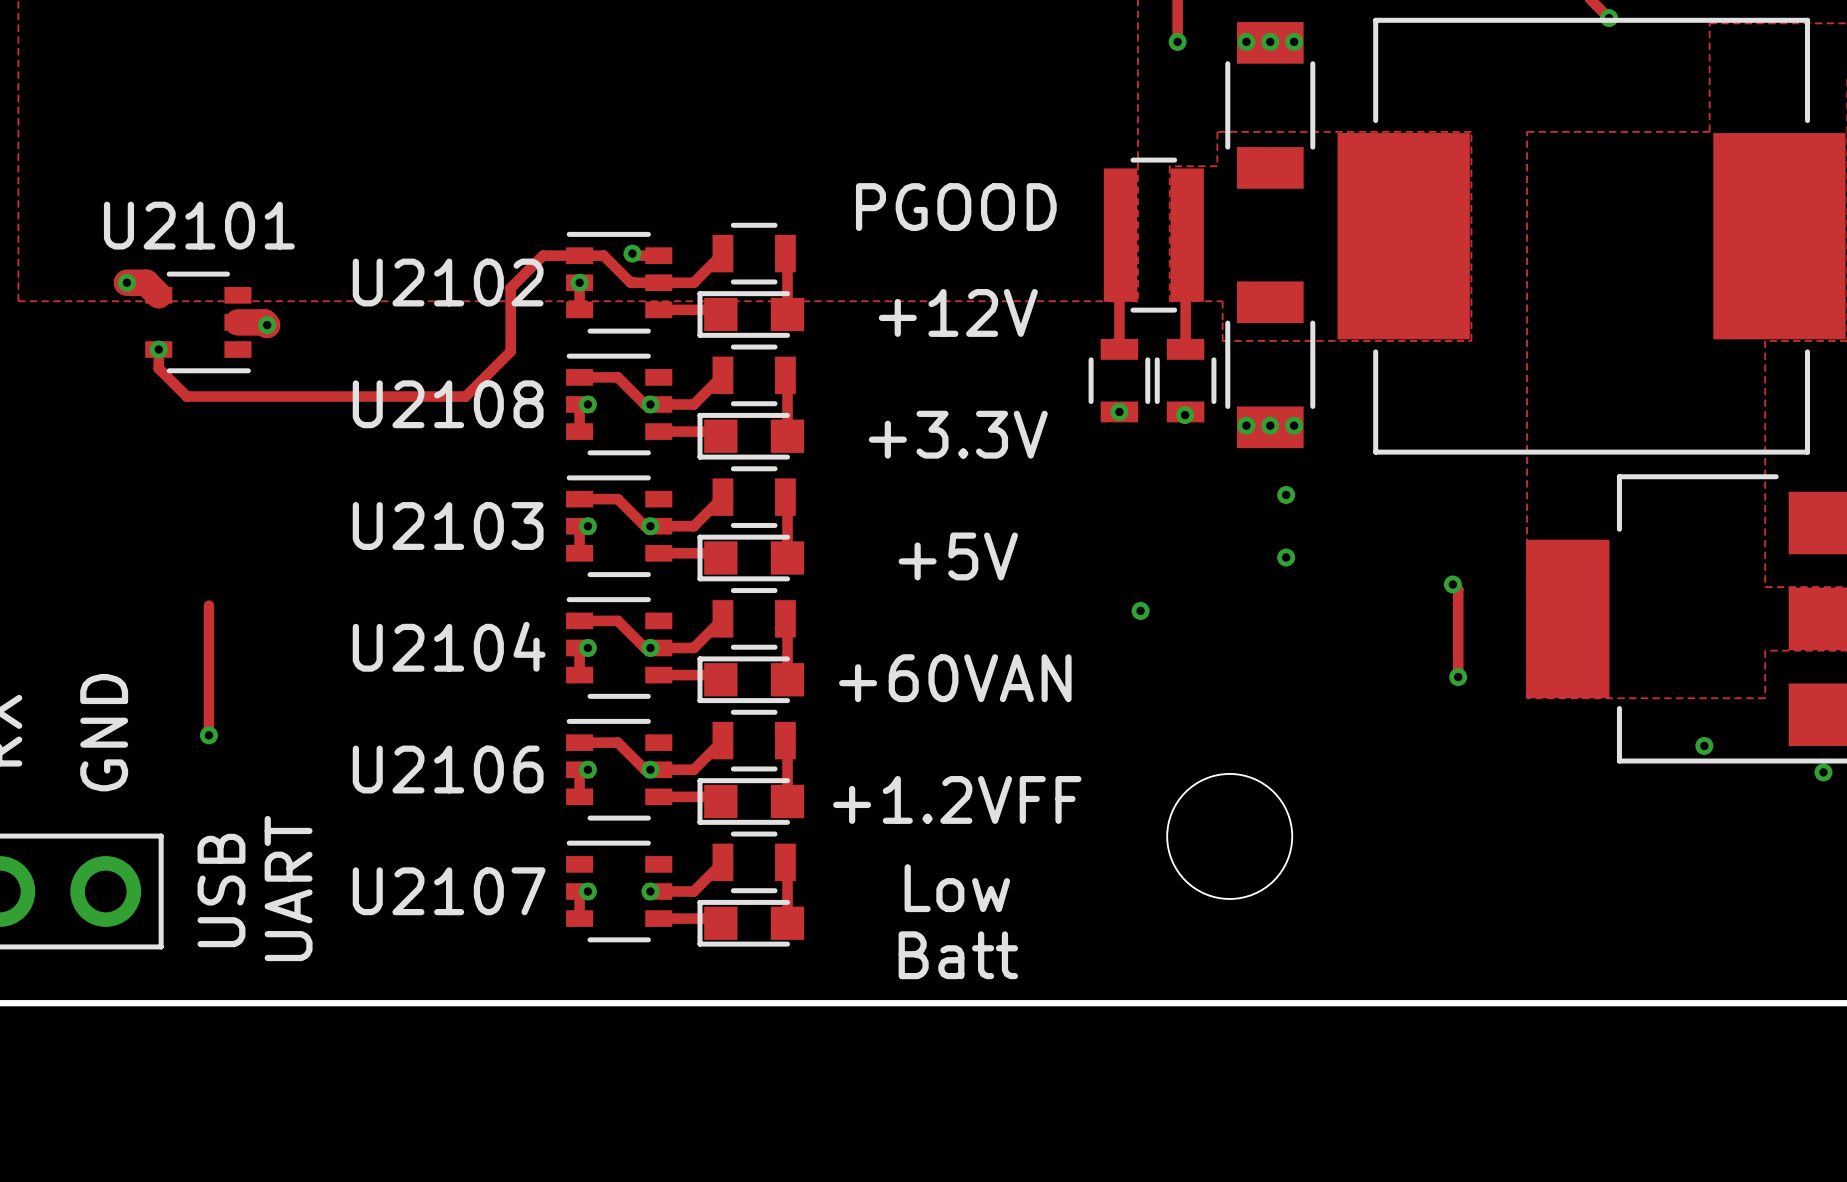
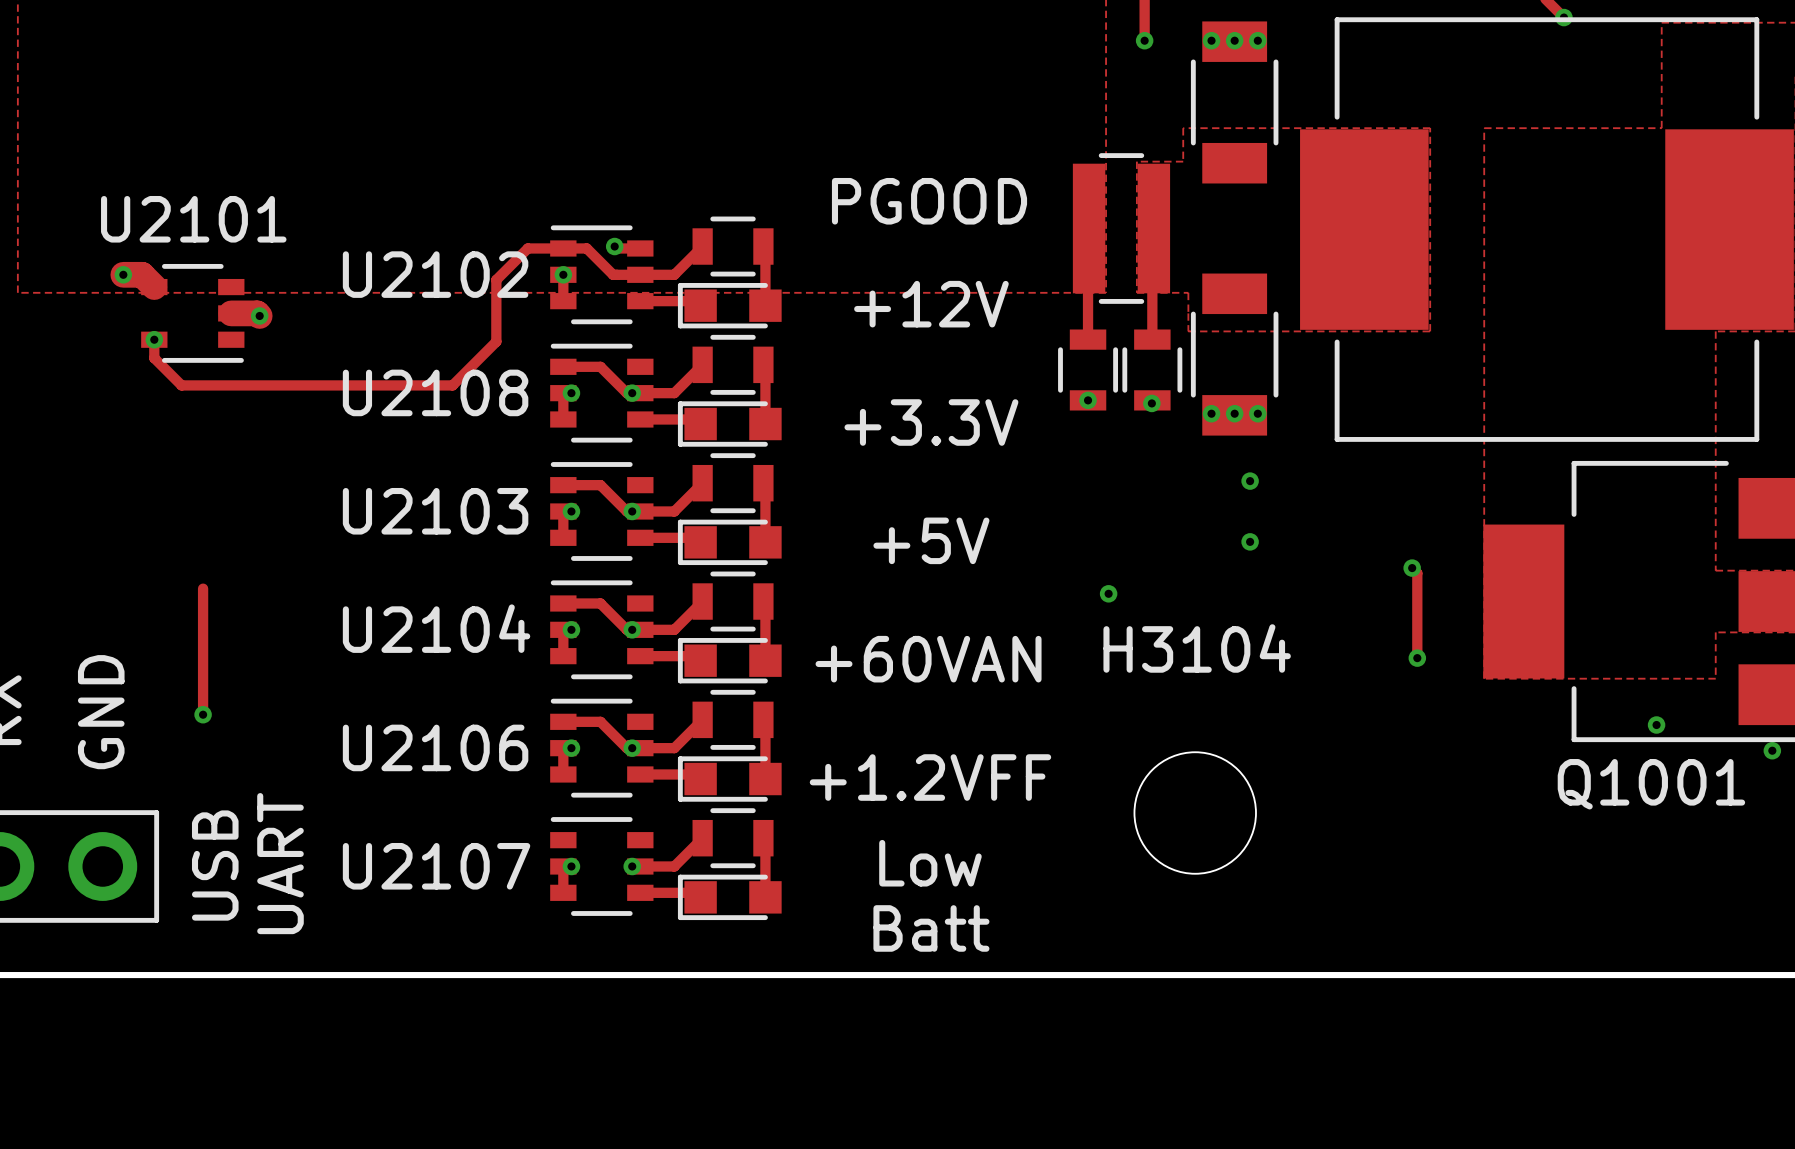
H3104 name: none -> H3104 (1197, 648)
Q1001 name: none -> Q1001 (1651, 784)

